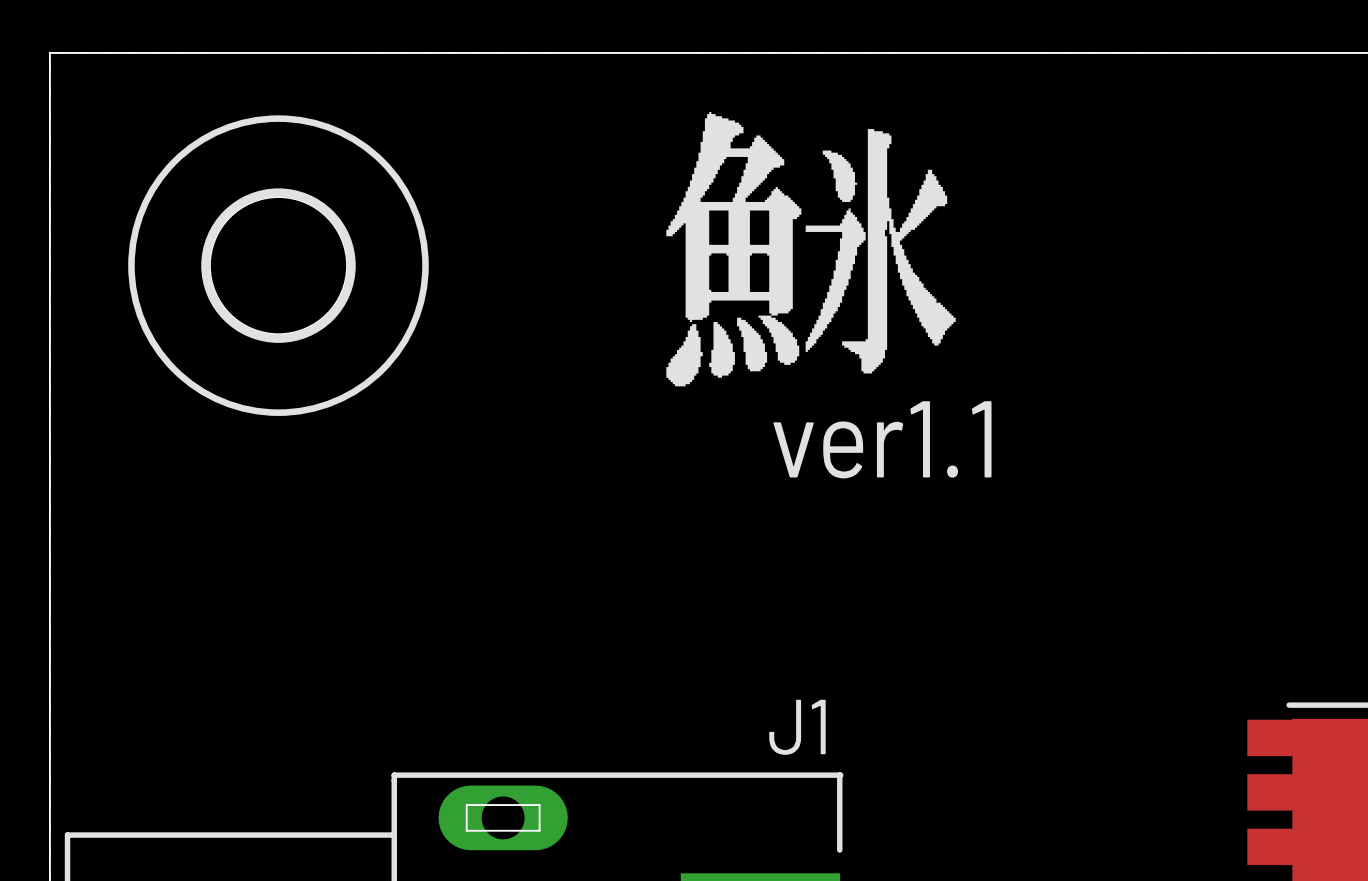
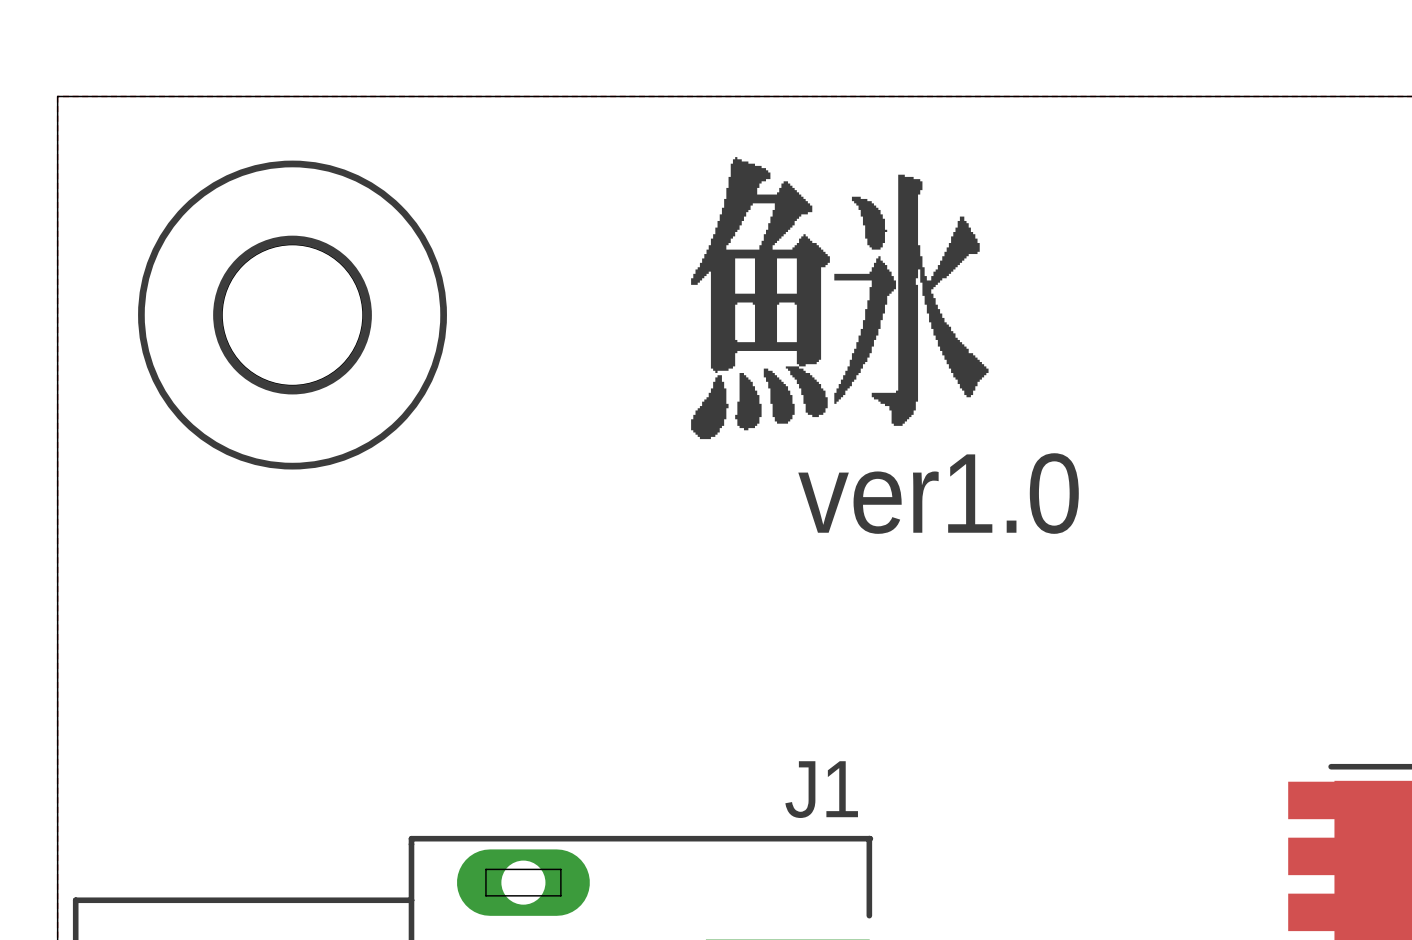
text: ver1.1 (882, 439) -> ver1.0 (938, 493)

